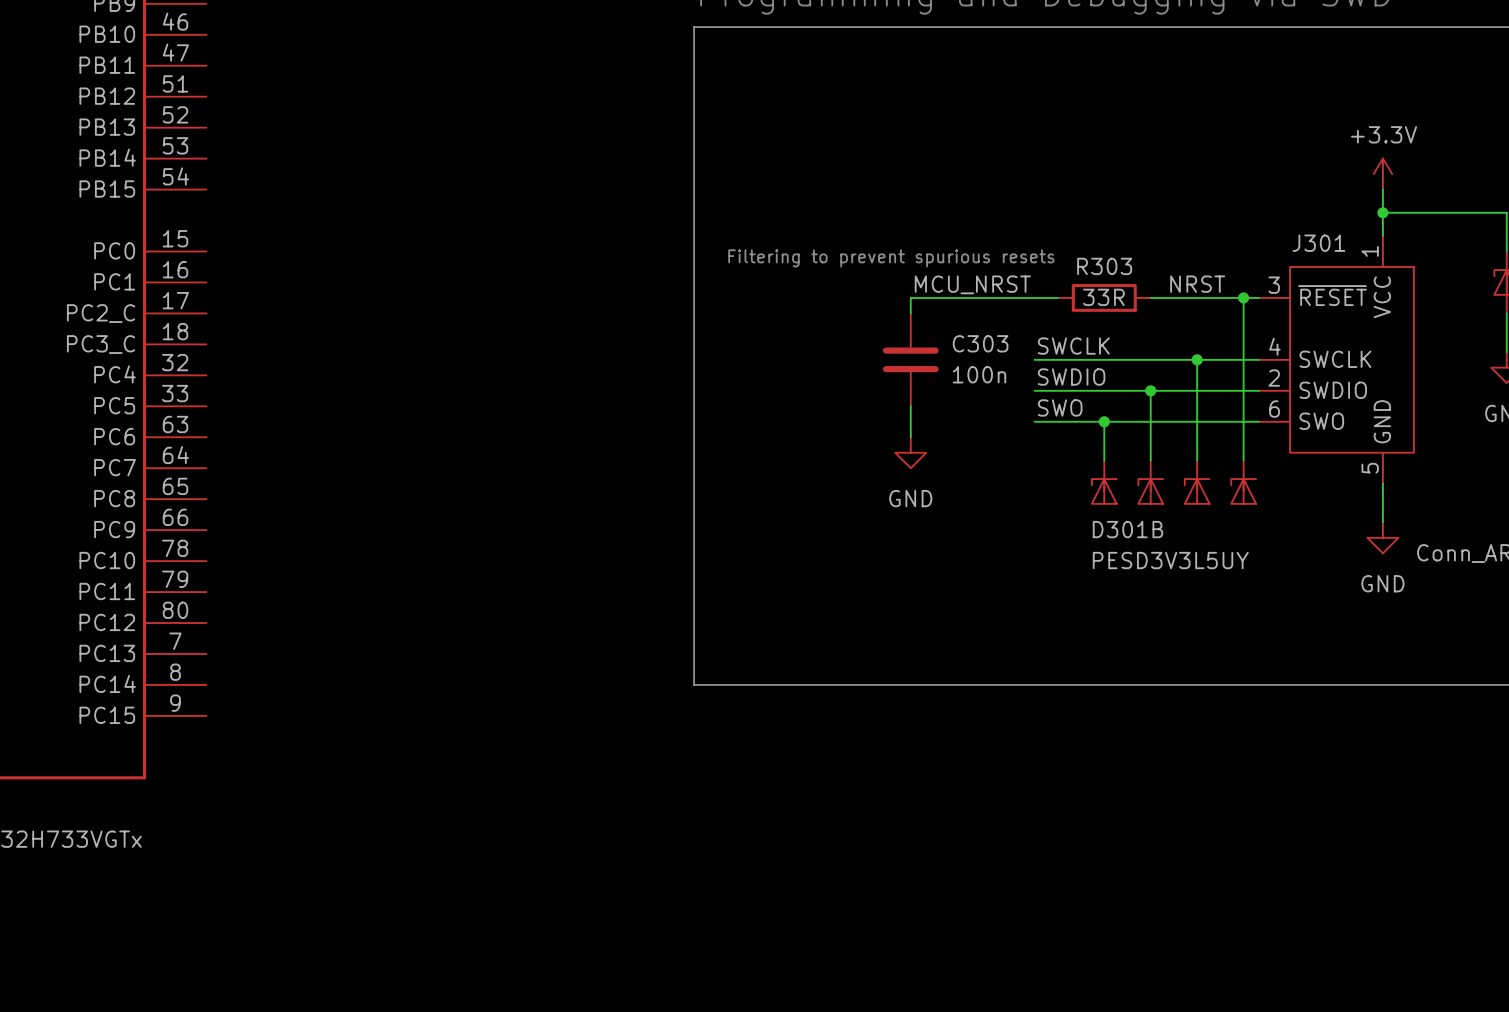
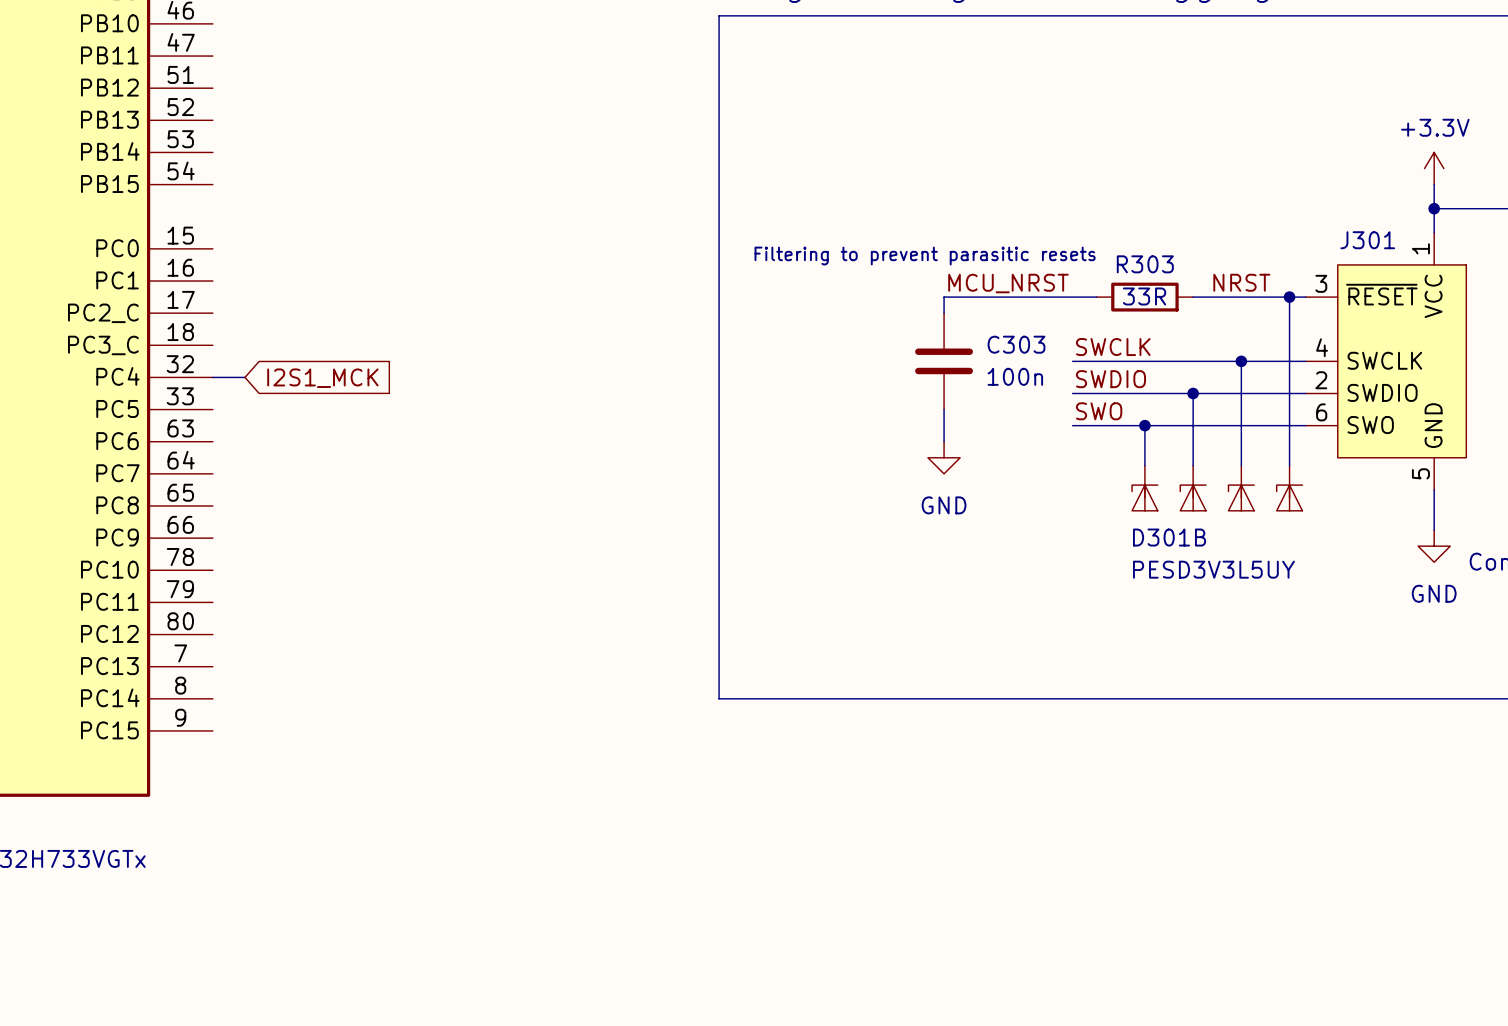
text: Filtering to prevent spurious resets (891, 258) -> Filtering to prevent parasitic resets (925, 256)
wire: none -> (212, 377) (245, 377)
global label: none -> I2S1_MCK (322, 378)

